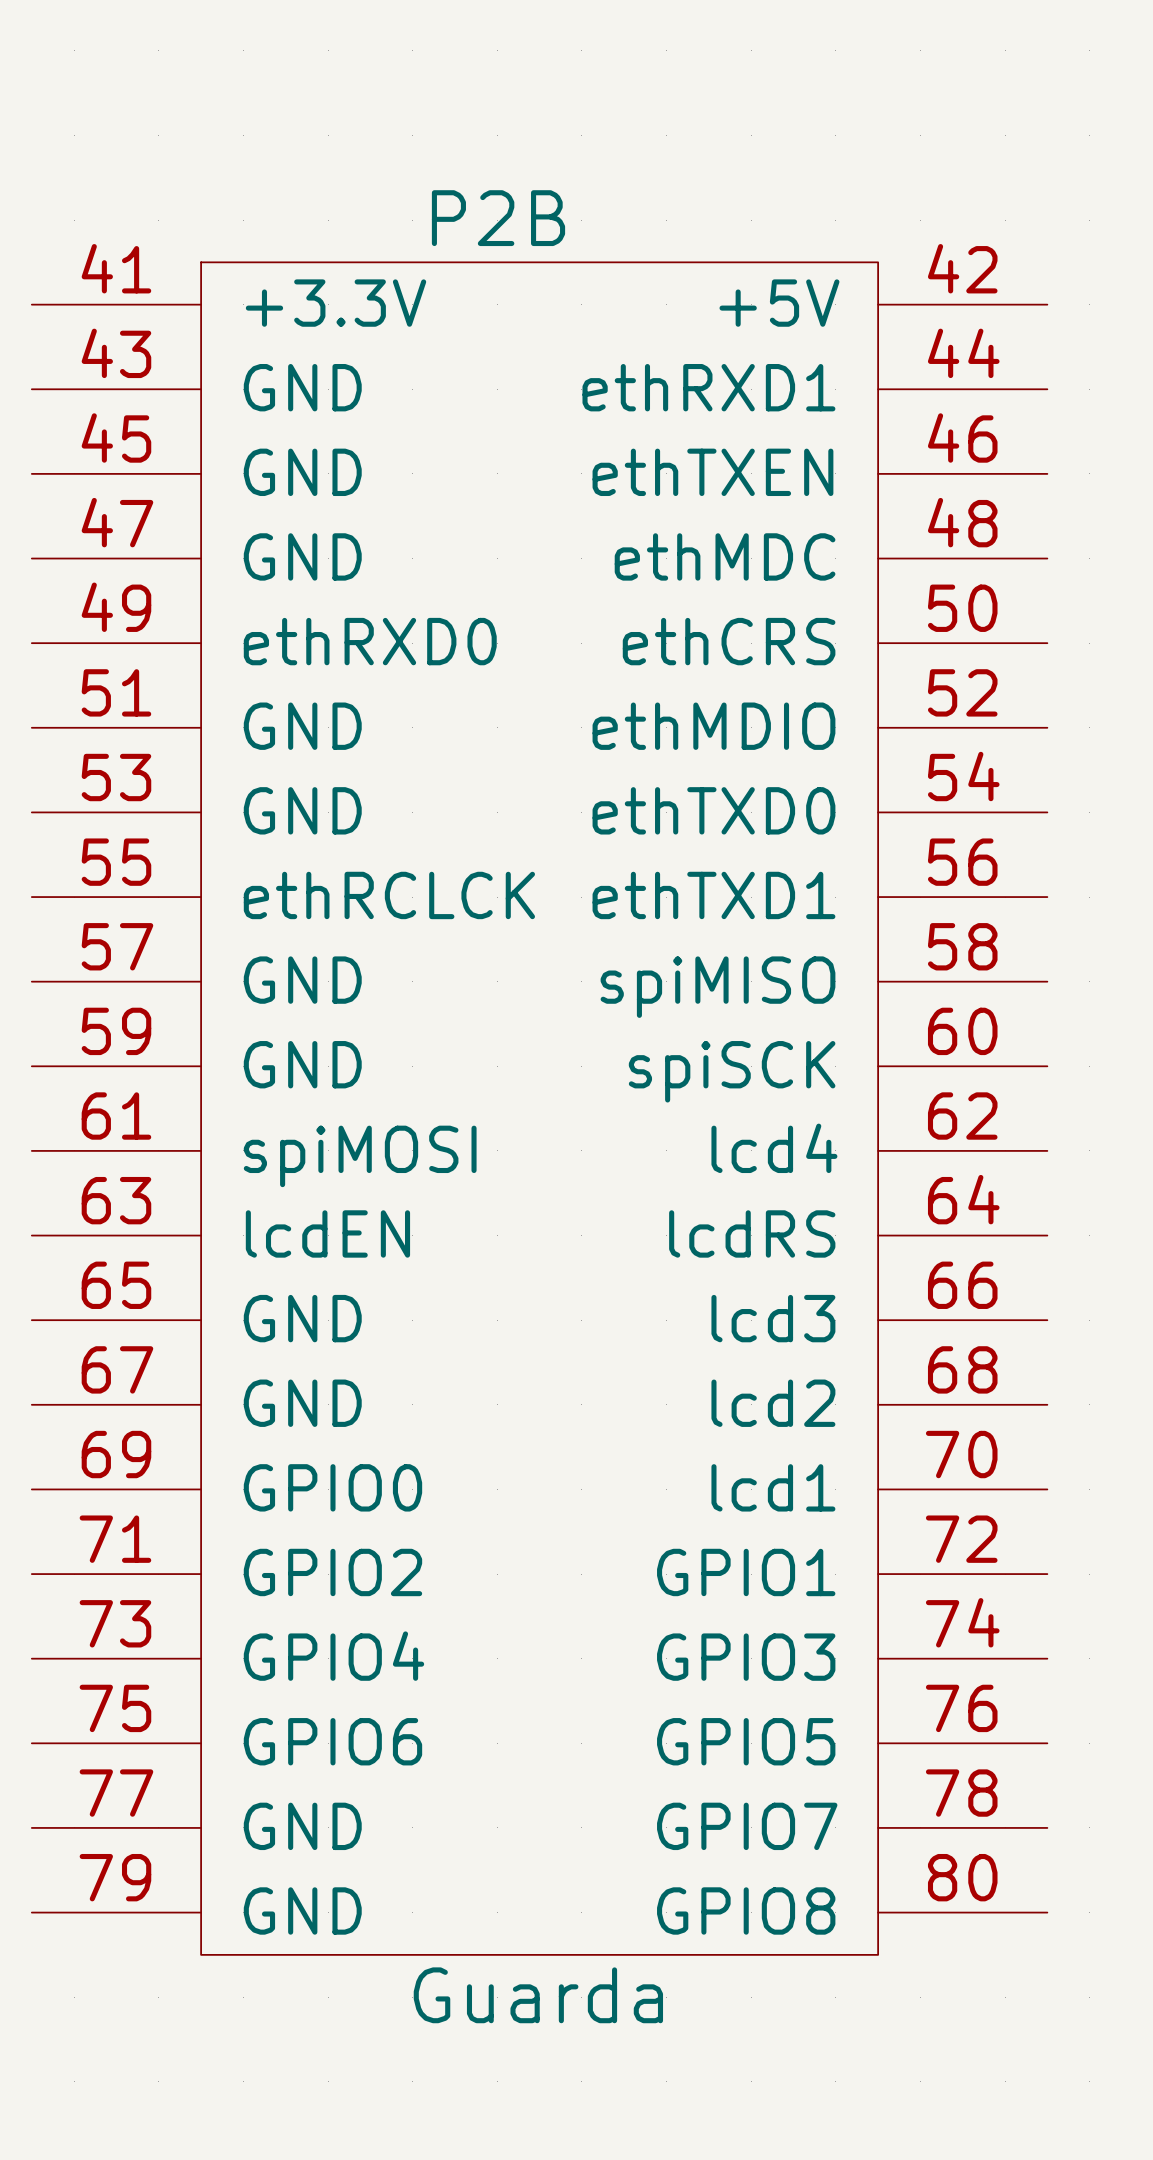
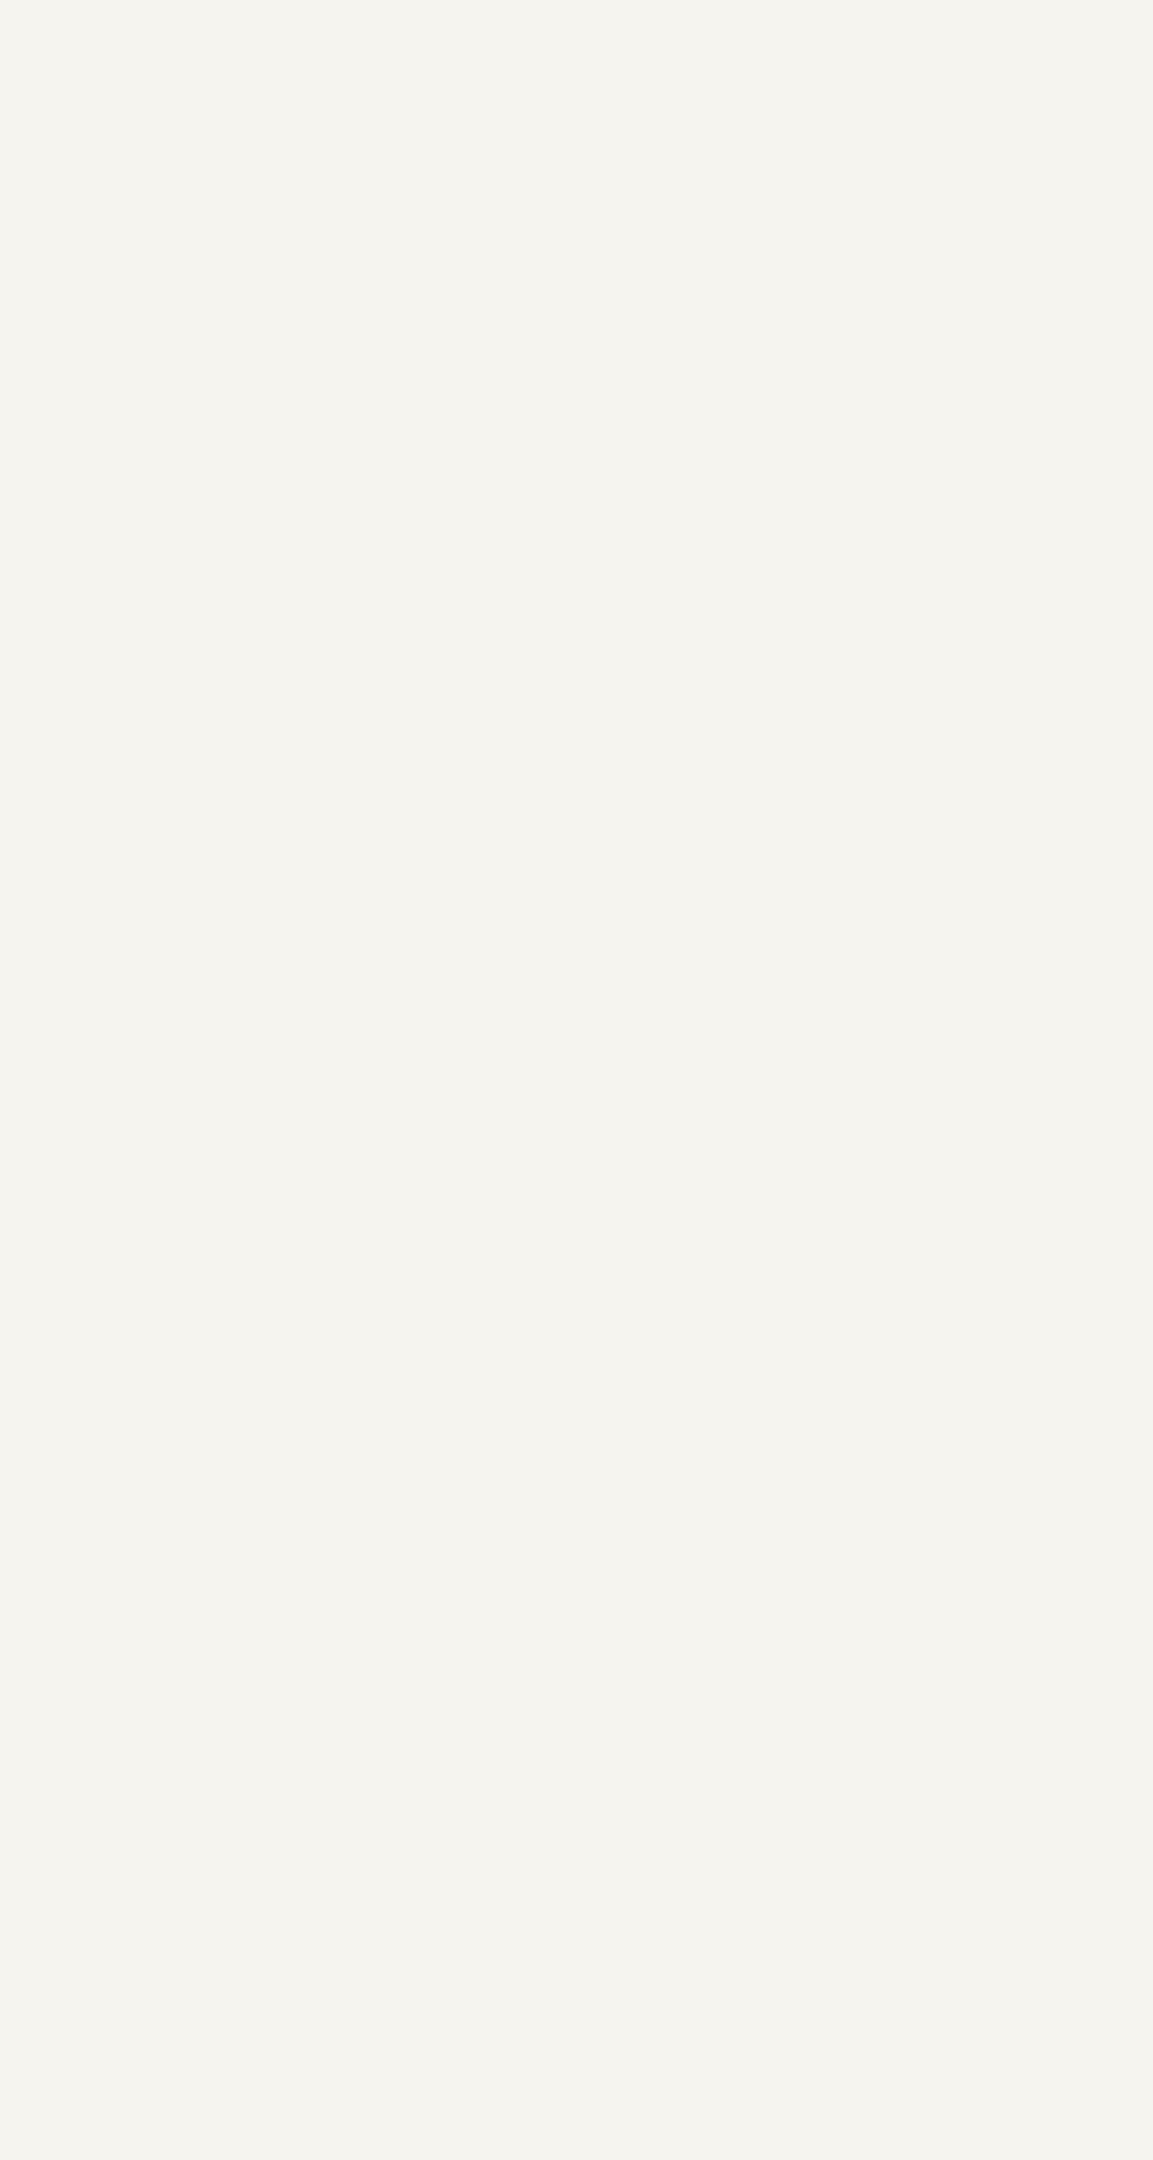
P2B: Guarda (539, 1108) -> none

